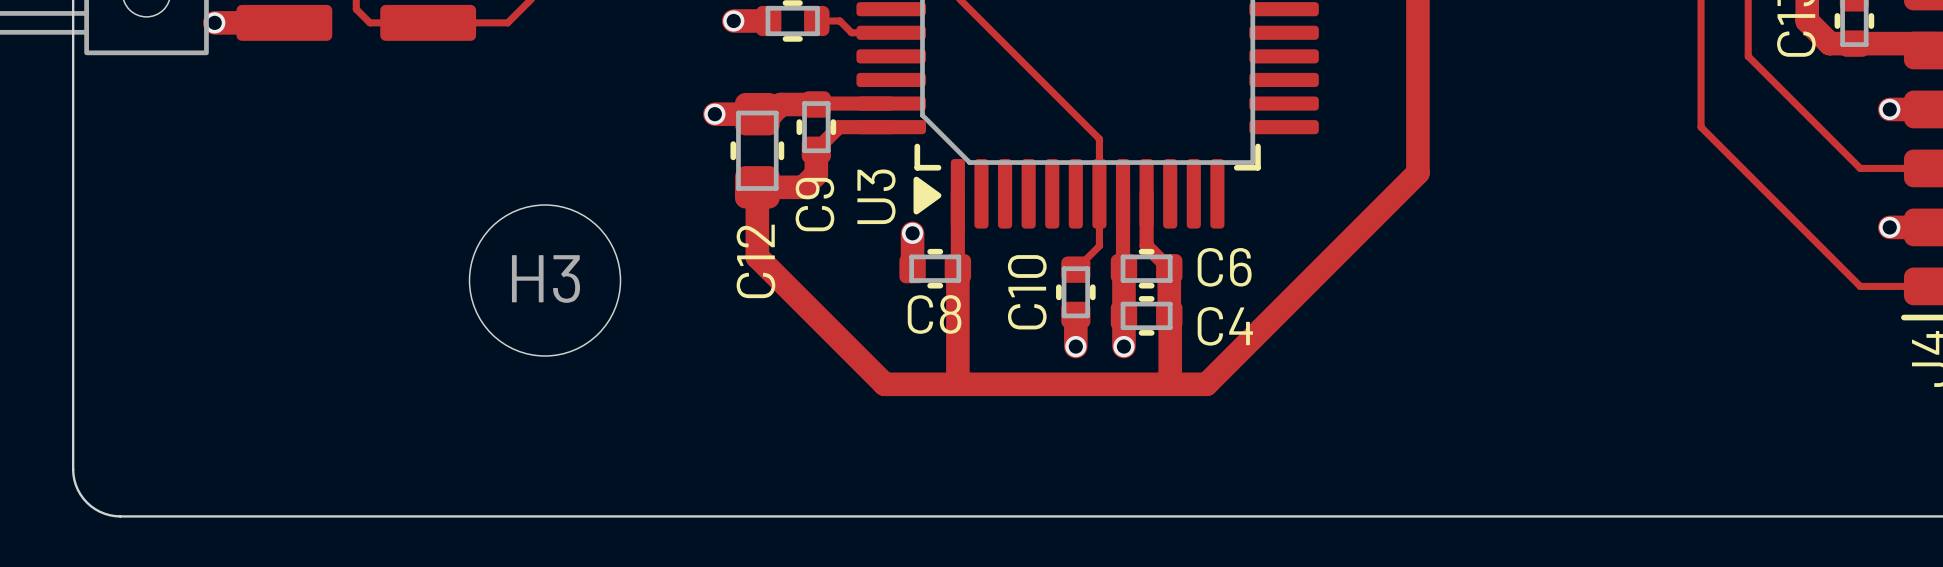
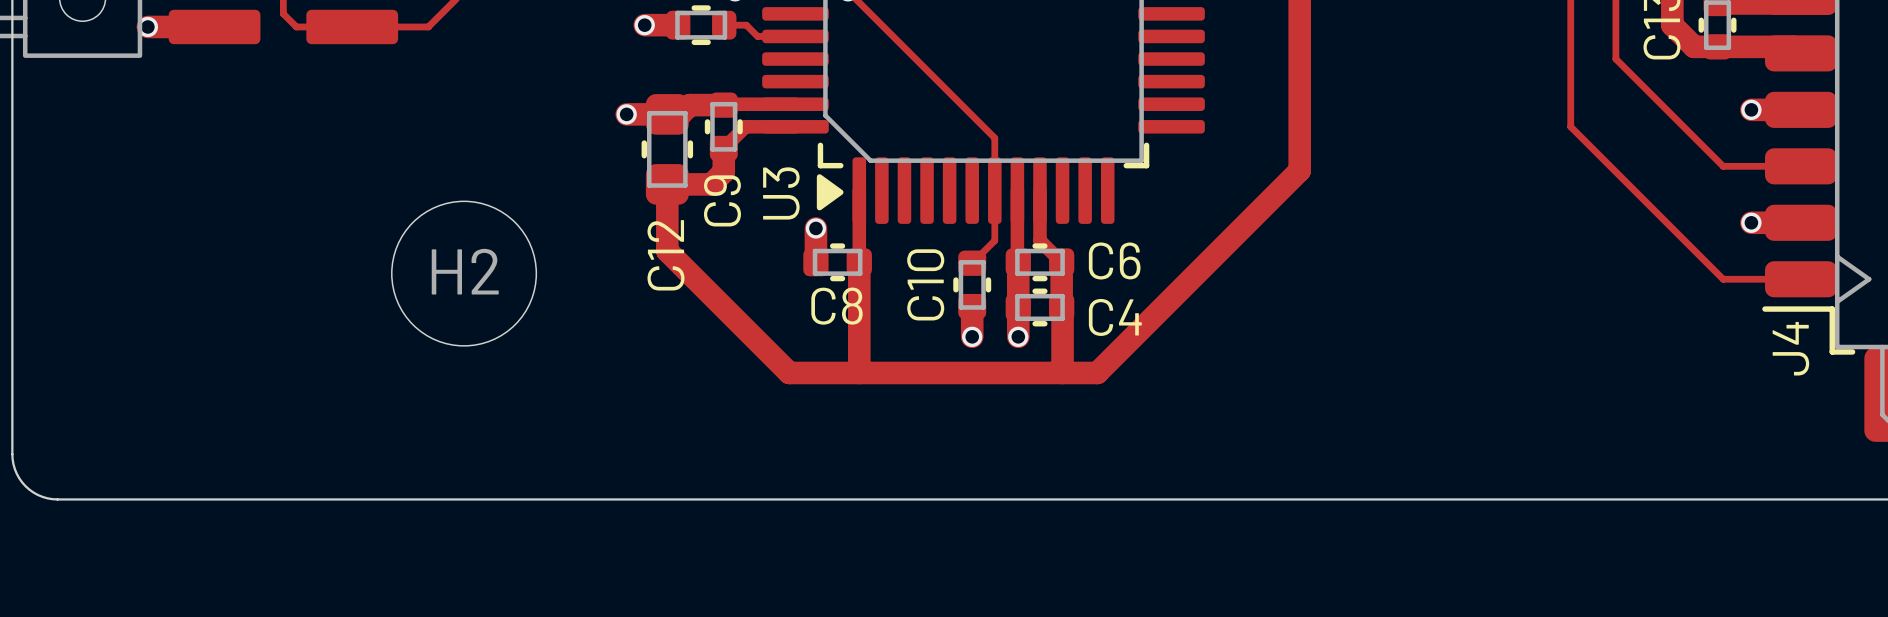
H3 name: H3 (545, 279) -> H2 (465, 271)

